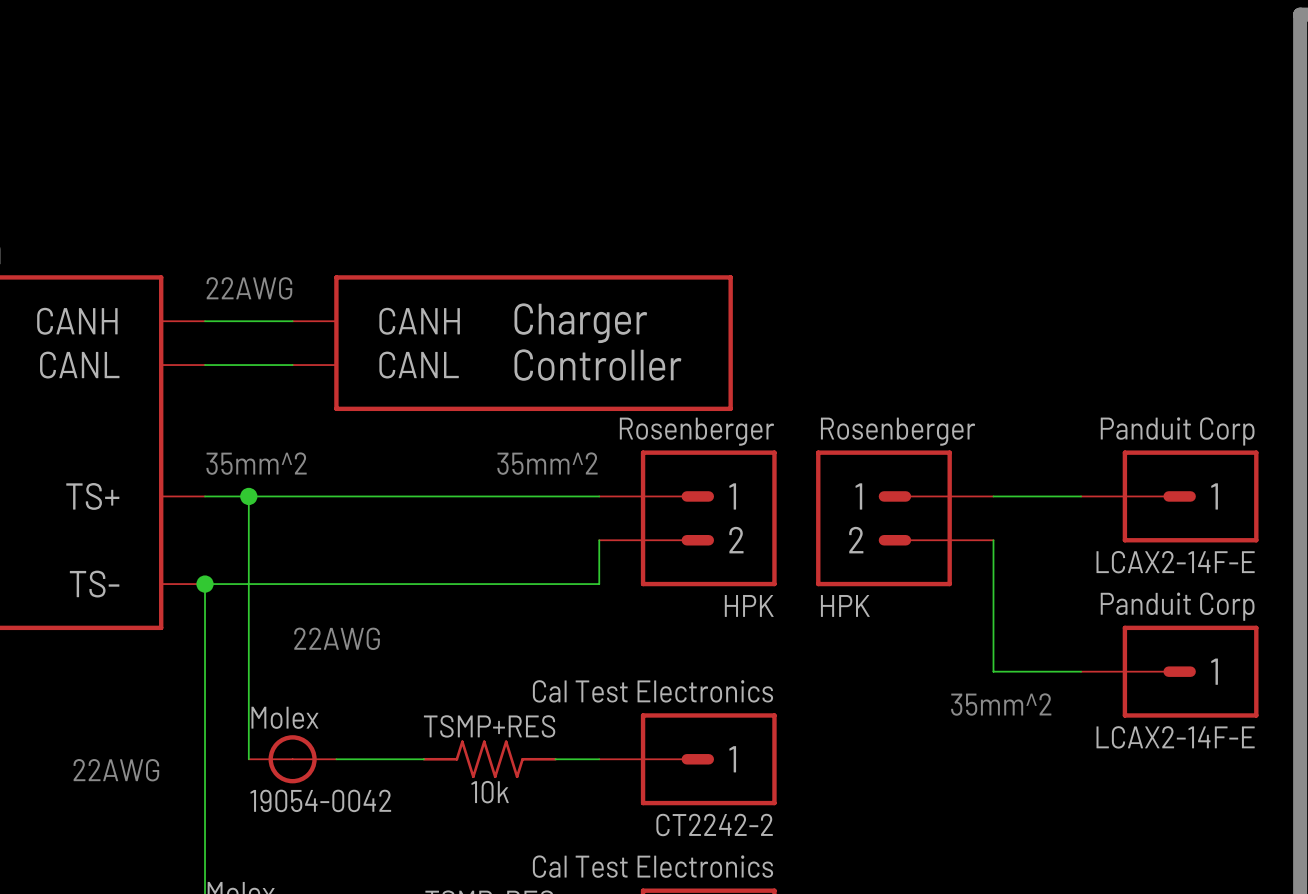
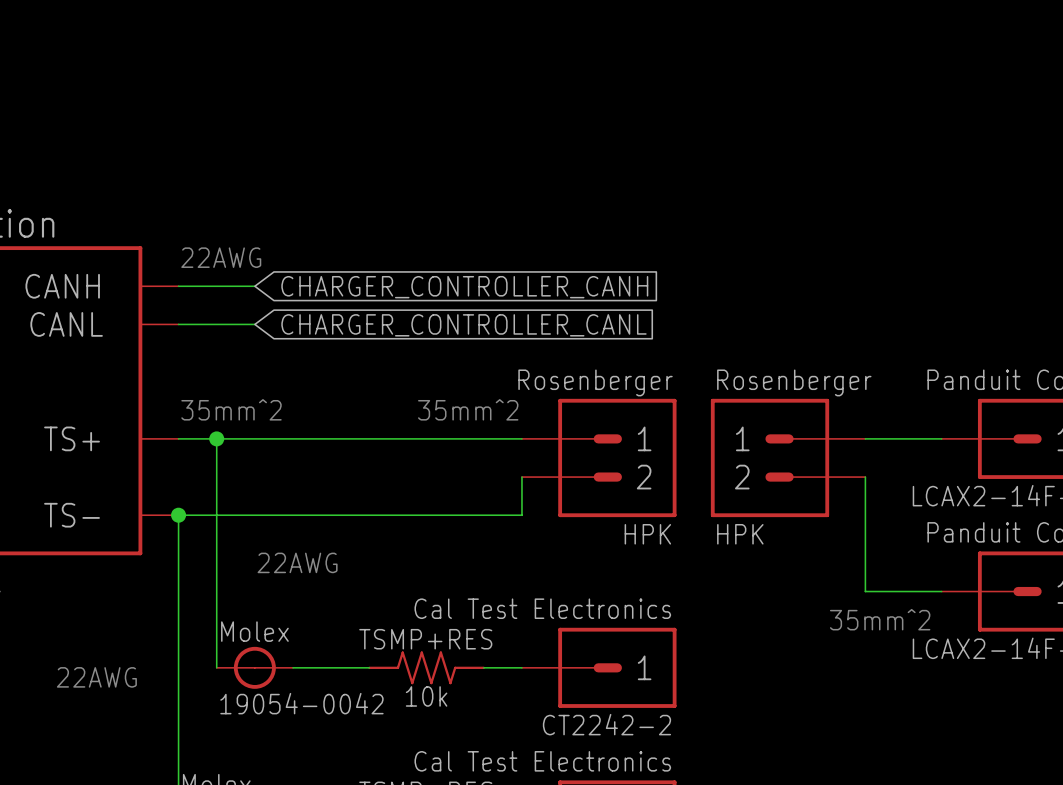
global label: none -> CHARGER_CONTROLLER_CANH (464, 287)
part: (512, 343) -> none
global label: none -> CHARGER_CONTROLLER_CANL (463, 325)

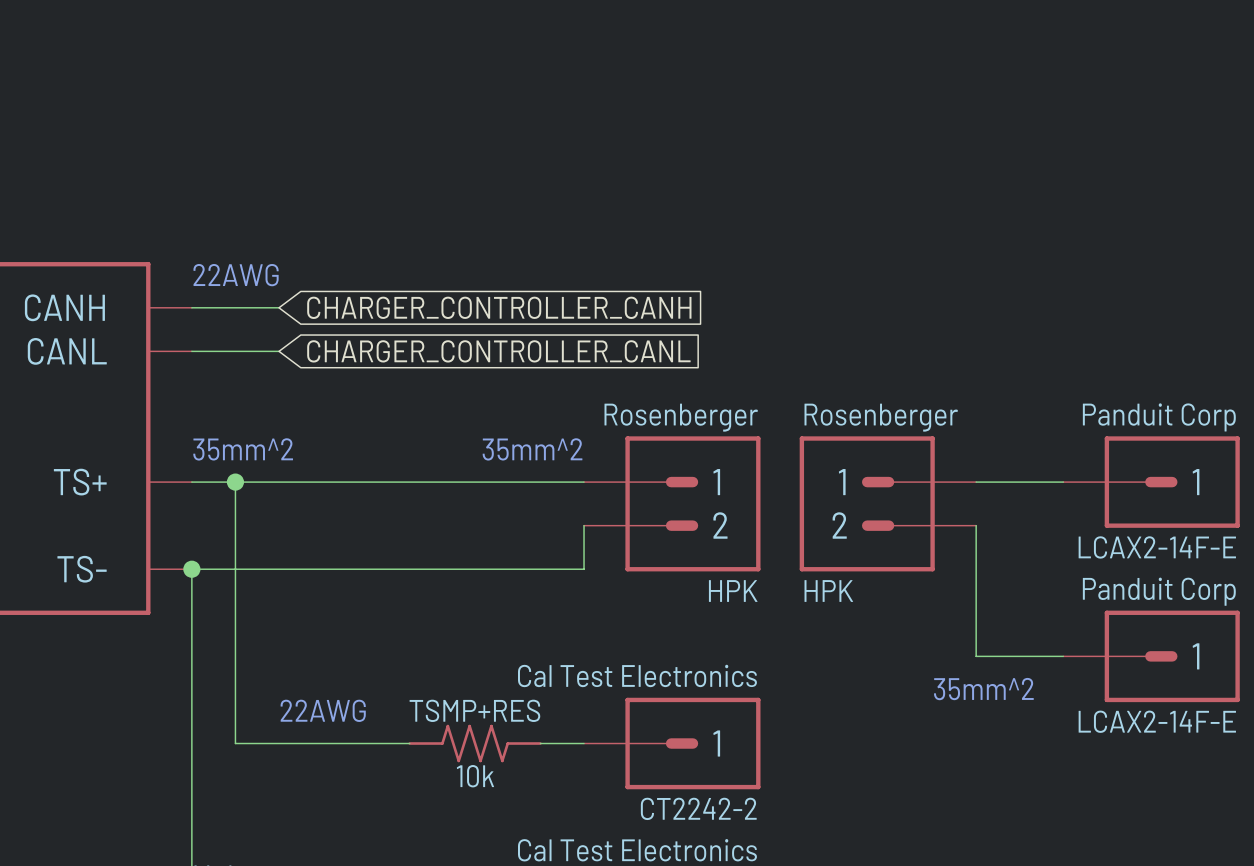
text: 22AWG (297, 562) -> none
text: none -> 22AWG (323, 710)
part: (254, 667) -> none
text: 22AWG (96, 677) -> none

